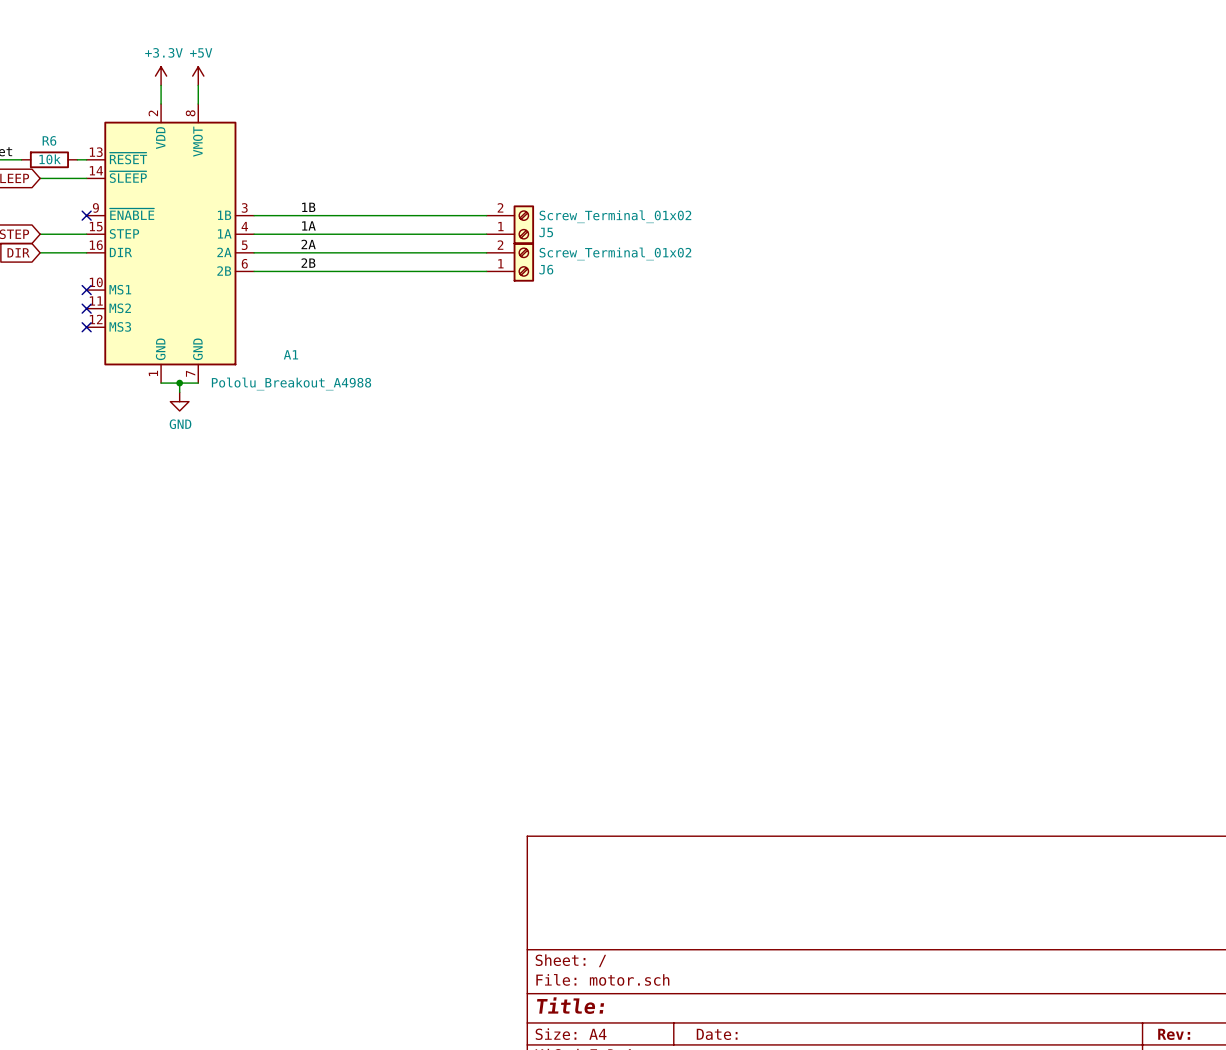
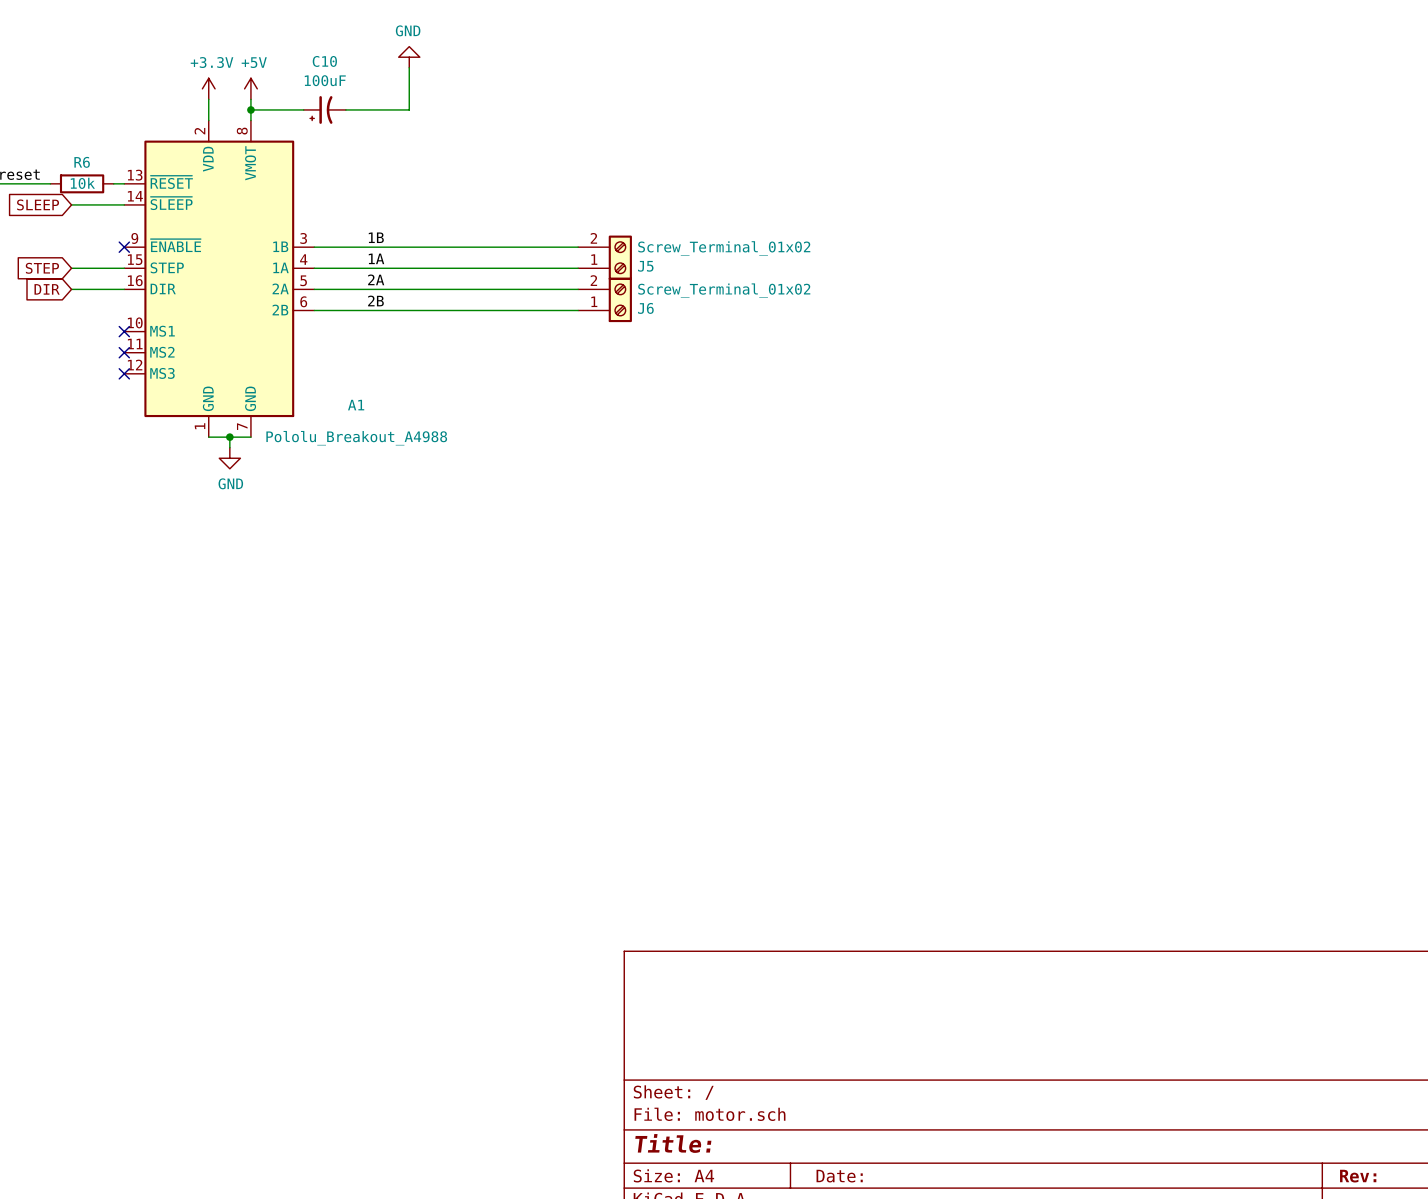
power symbol: none -> GND (409, 57)
wire: none -> (409, 67) (409, 109) (345, 109)
wire: none -> (250, 109) (303, 109)
junction: none -> (250, 109)
C10: none -> 100uF (324, 109)

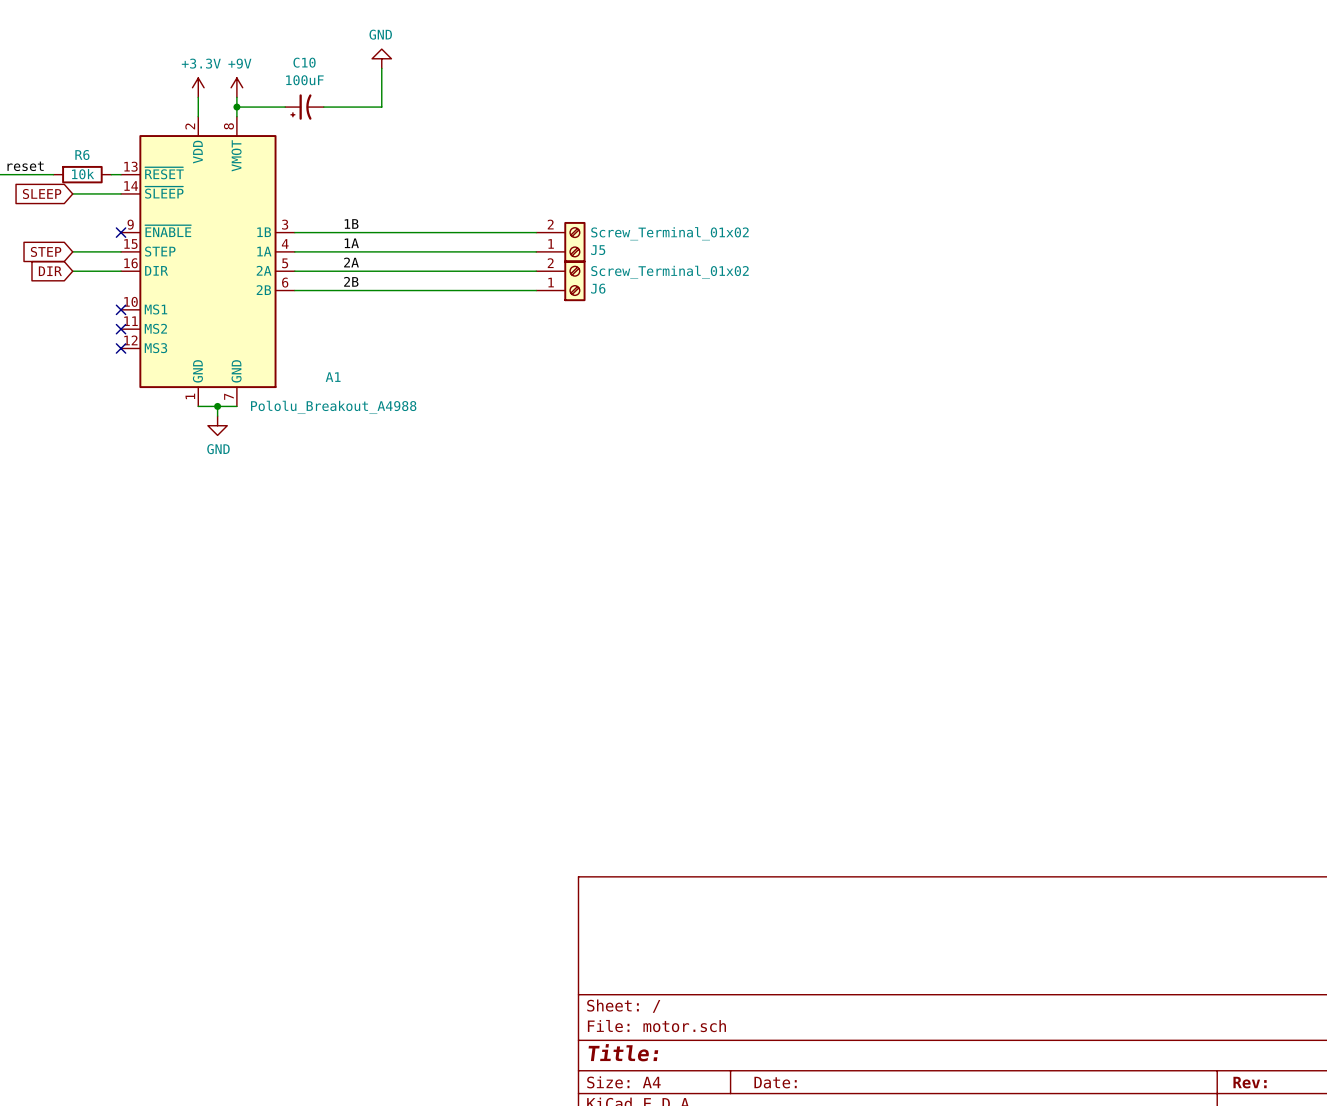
power symbol: +5V (250, 88) -> +9V (236, 87)

